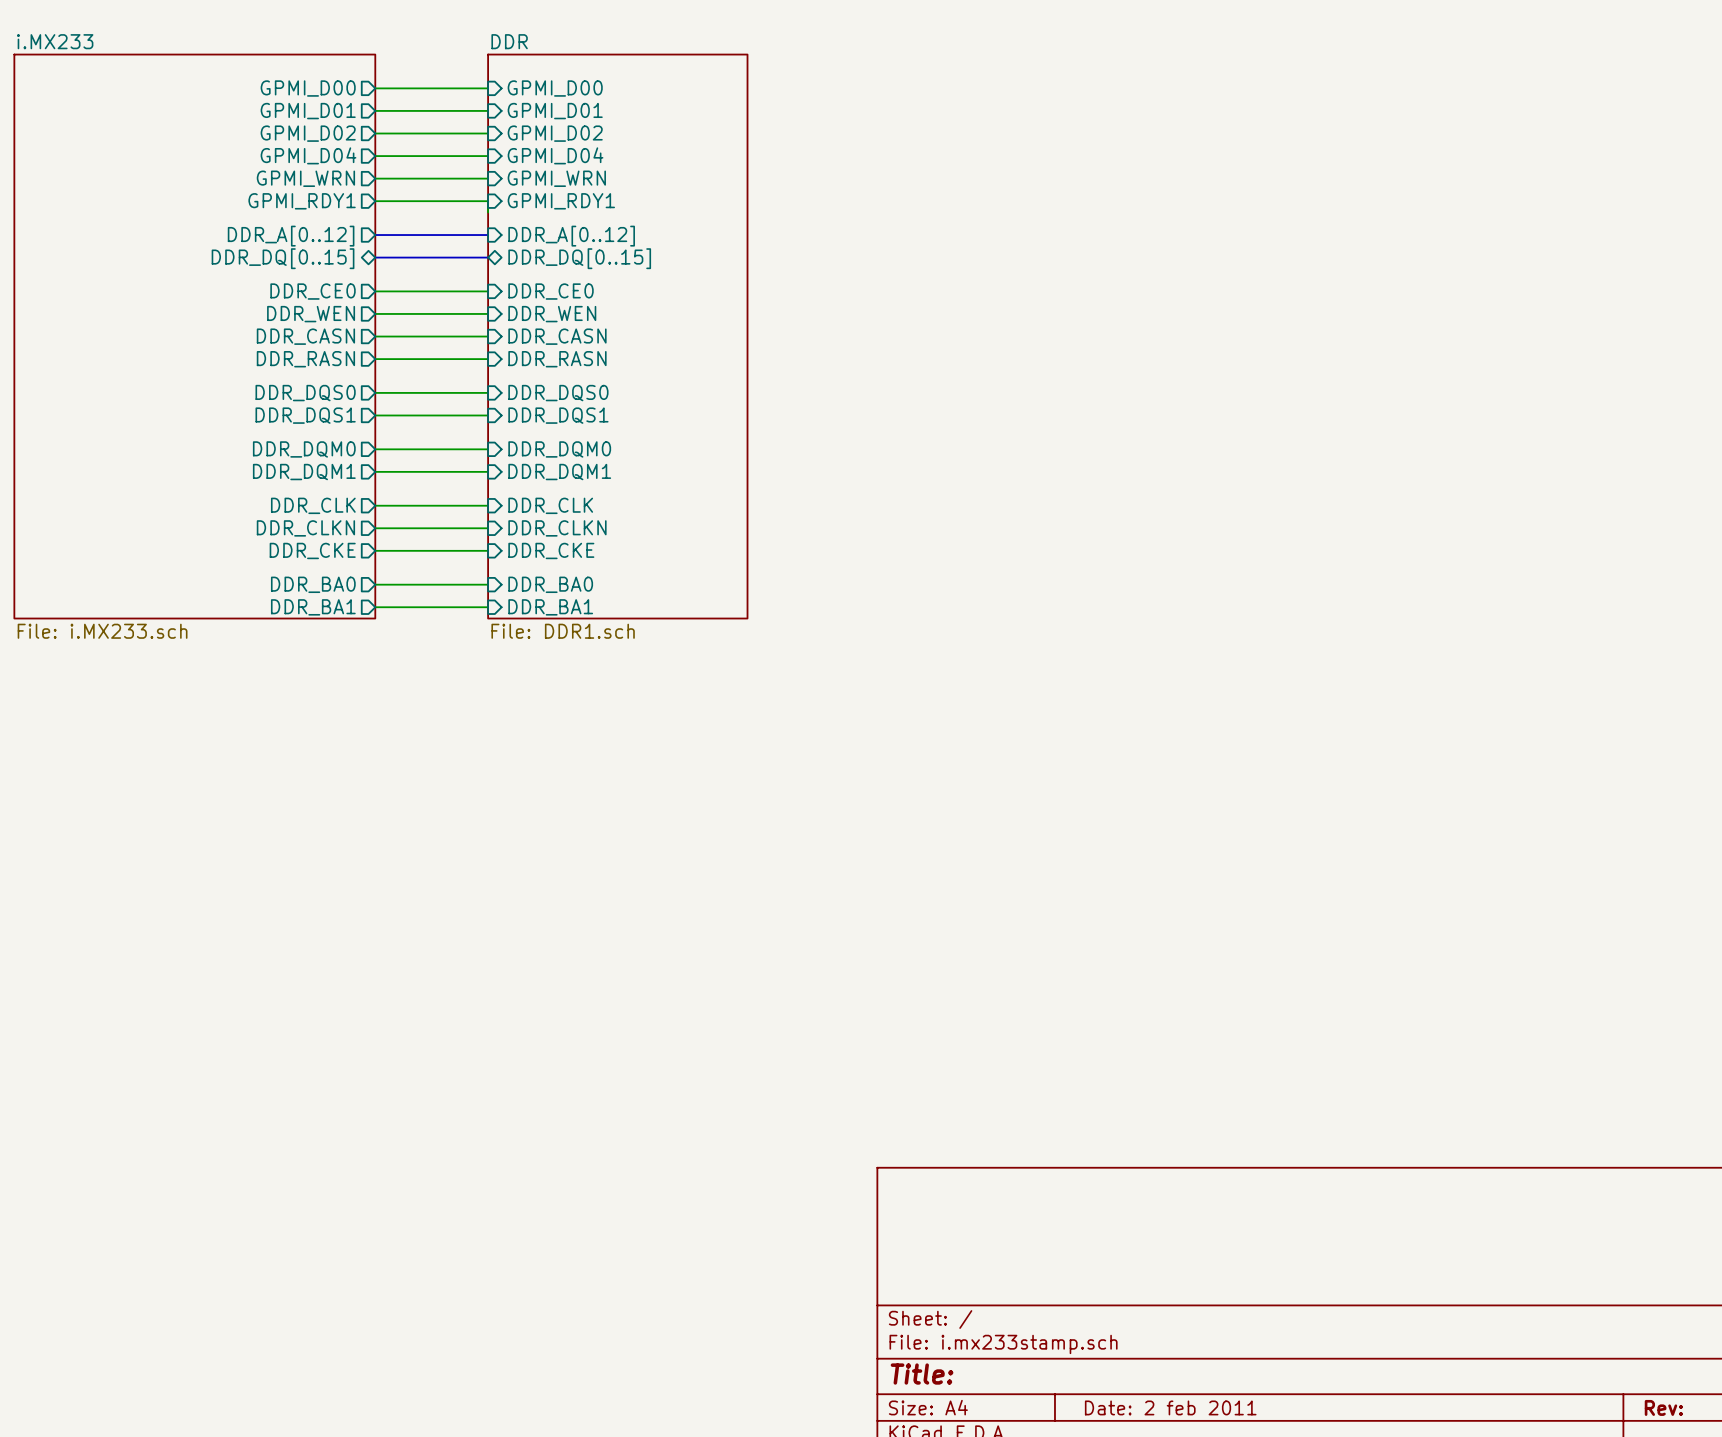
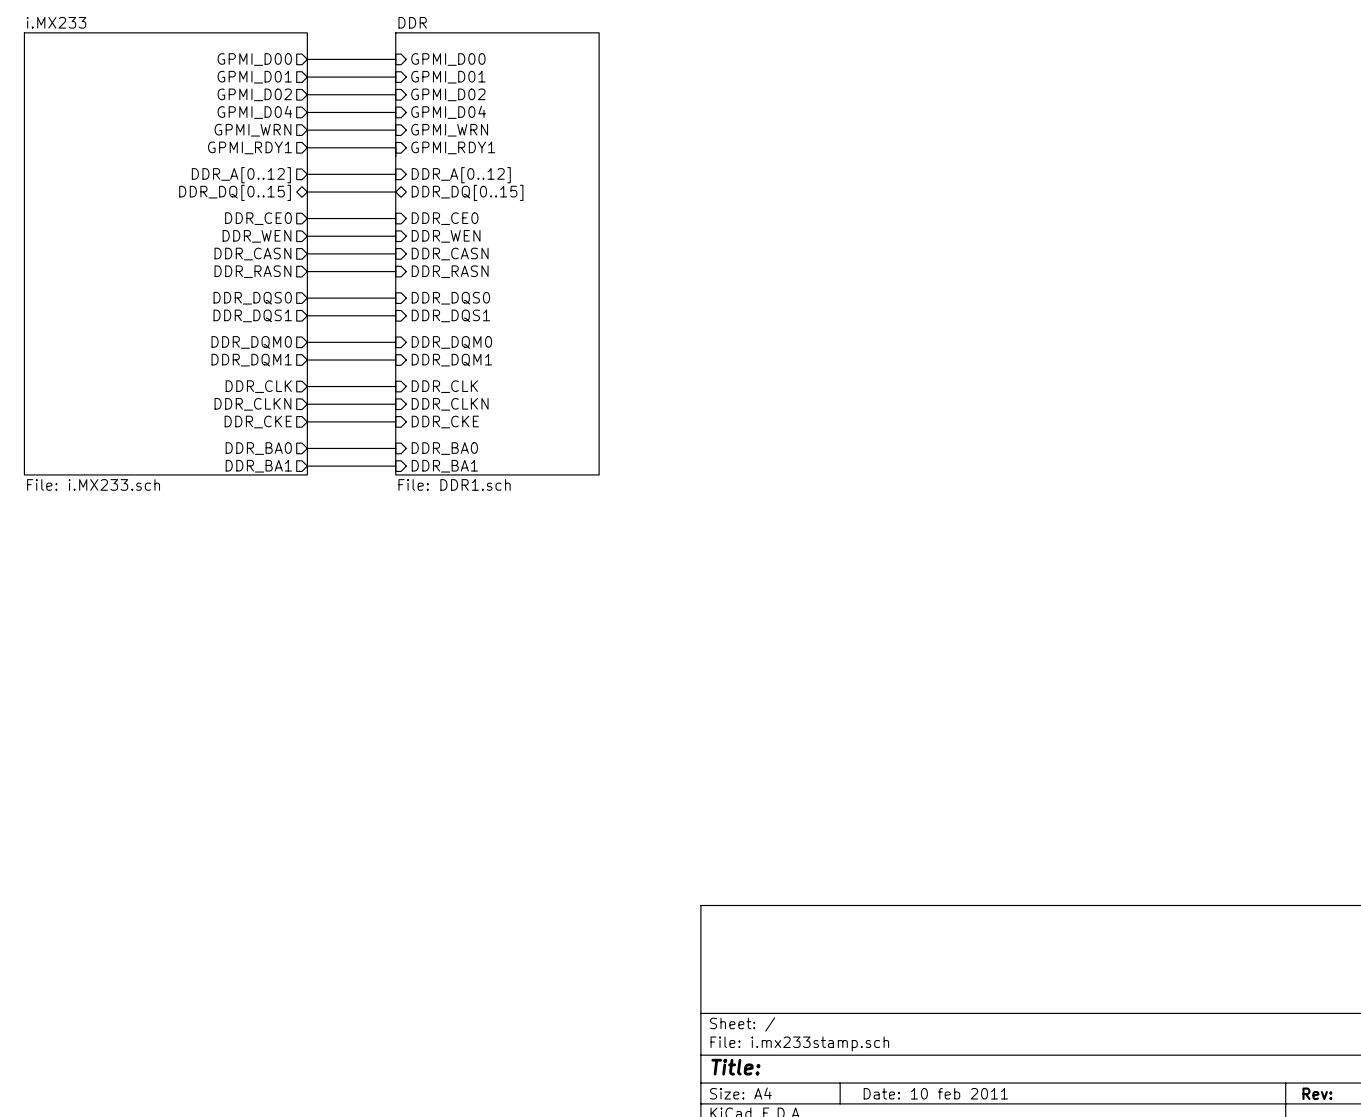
title block: Date: 2 feb 2011 (1170, 1407) -> Date: 10 feb 2011 (935, 1093)

